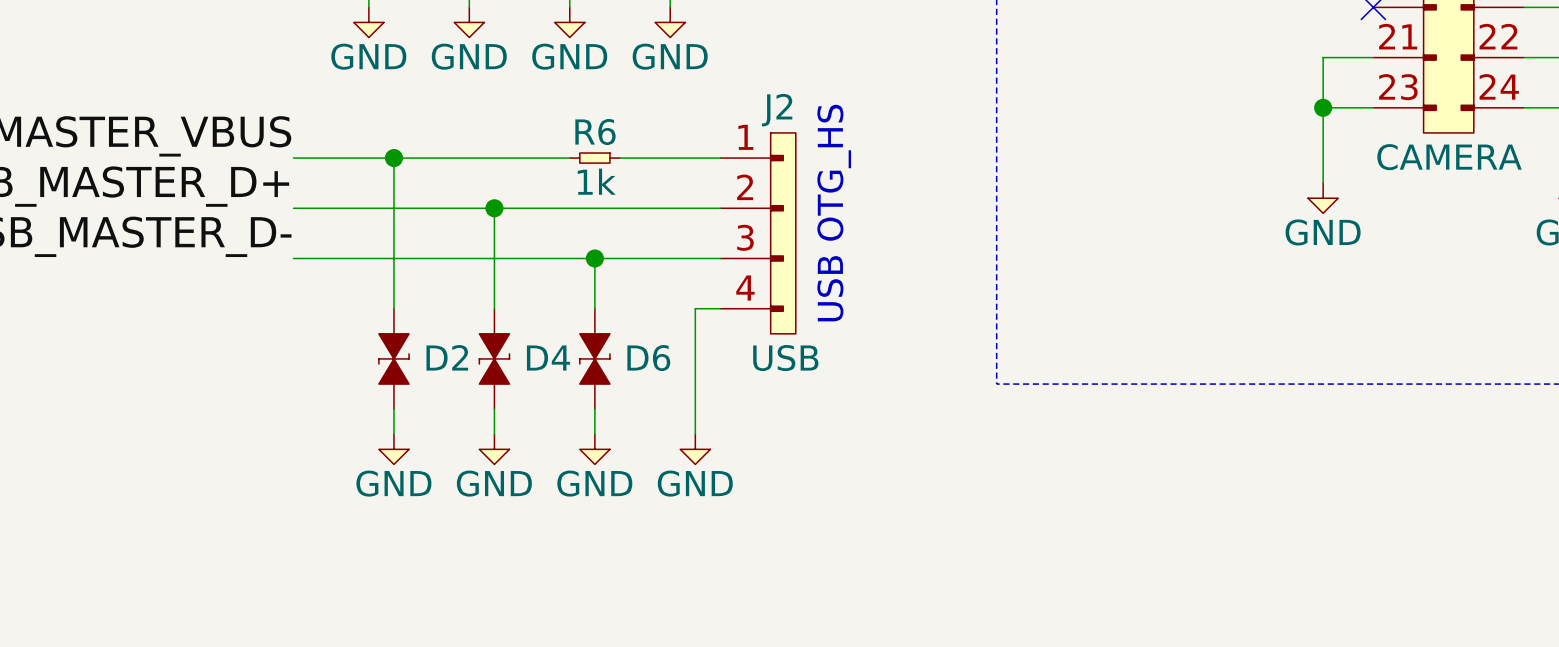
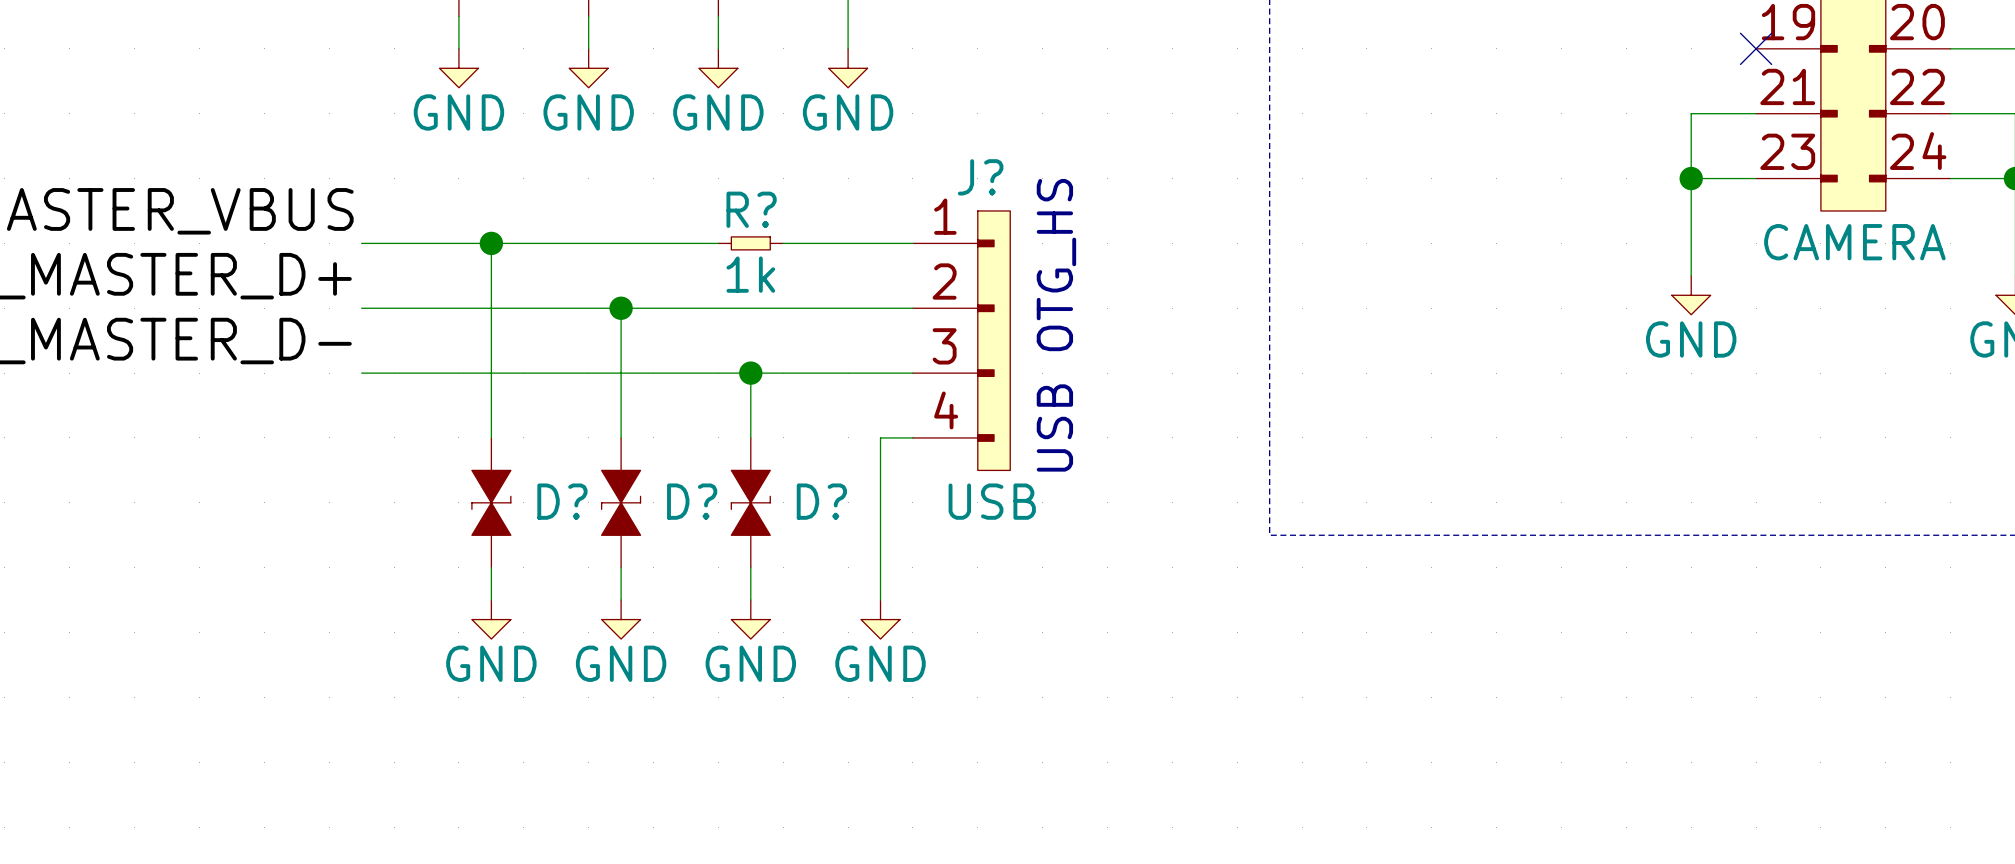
J2 name: J2 (777, 110) -> J? (980, 177)
R6 name: R6 (595, 132) -> R? (751, 209)
D2 name: D2 (447, 357) -> D? (562, 501)
D4 name: D4 (548, 358) -> D? (692, 501)
D6 name: D6 (648, 358) -> D? (821, 501)

